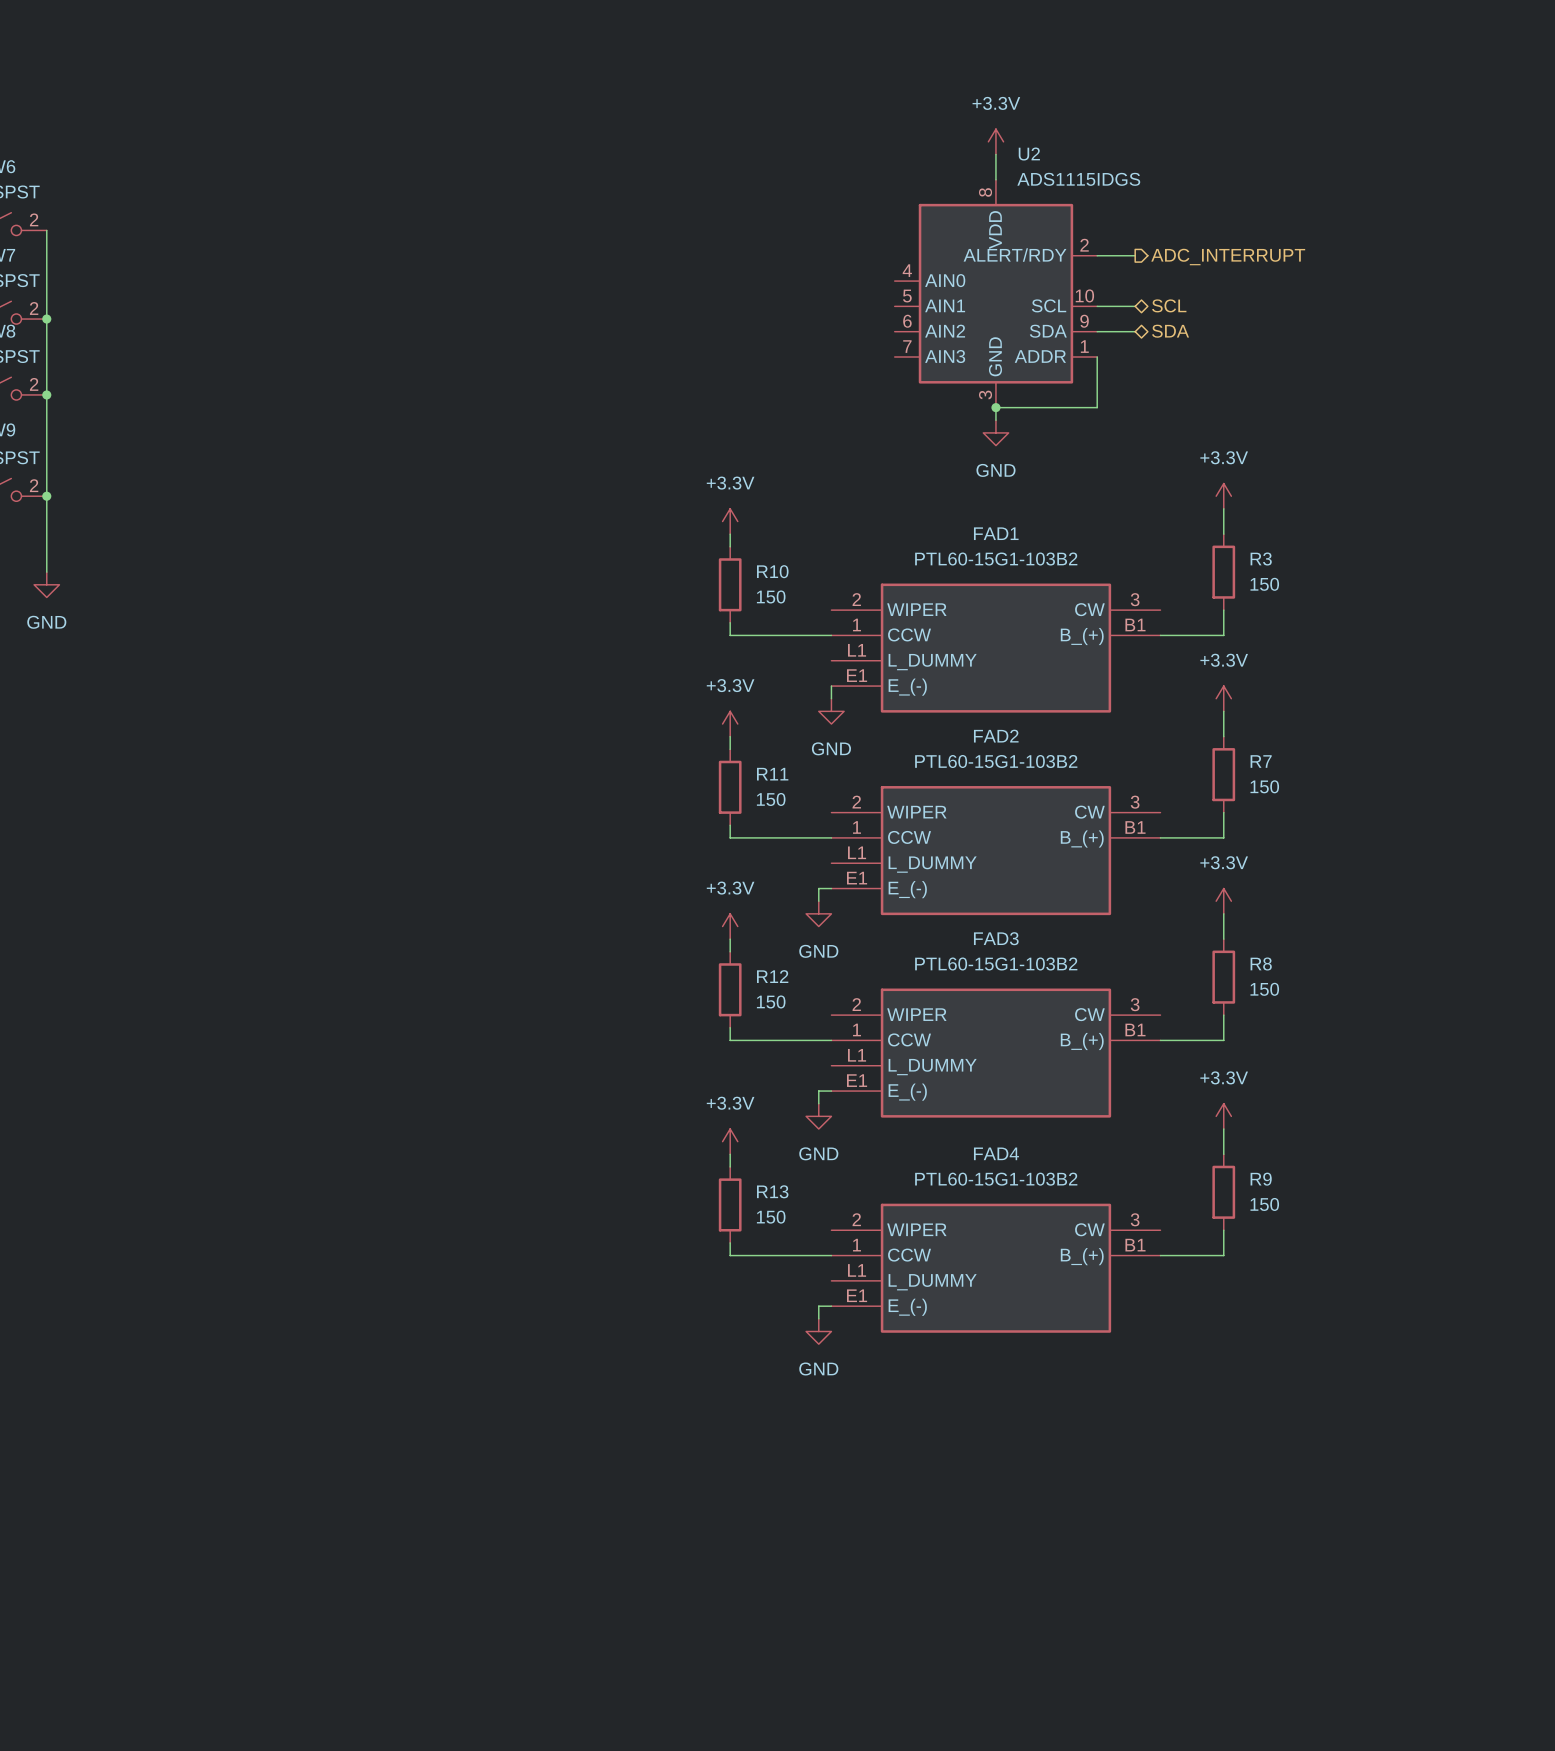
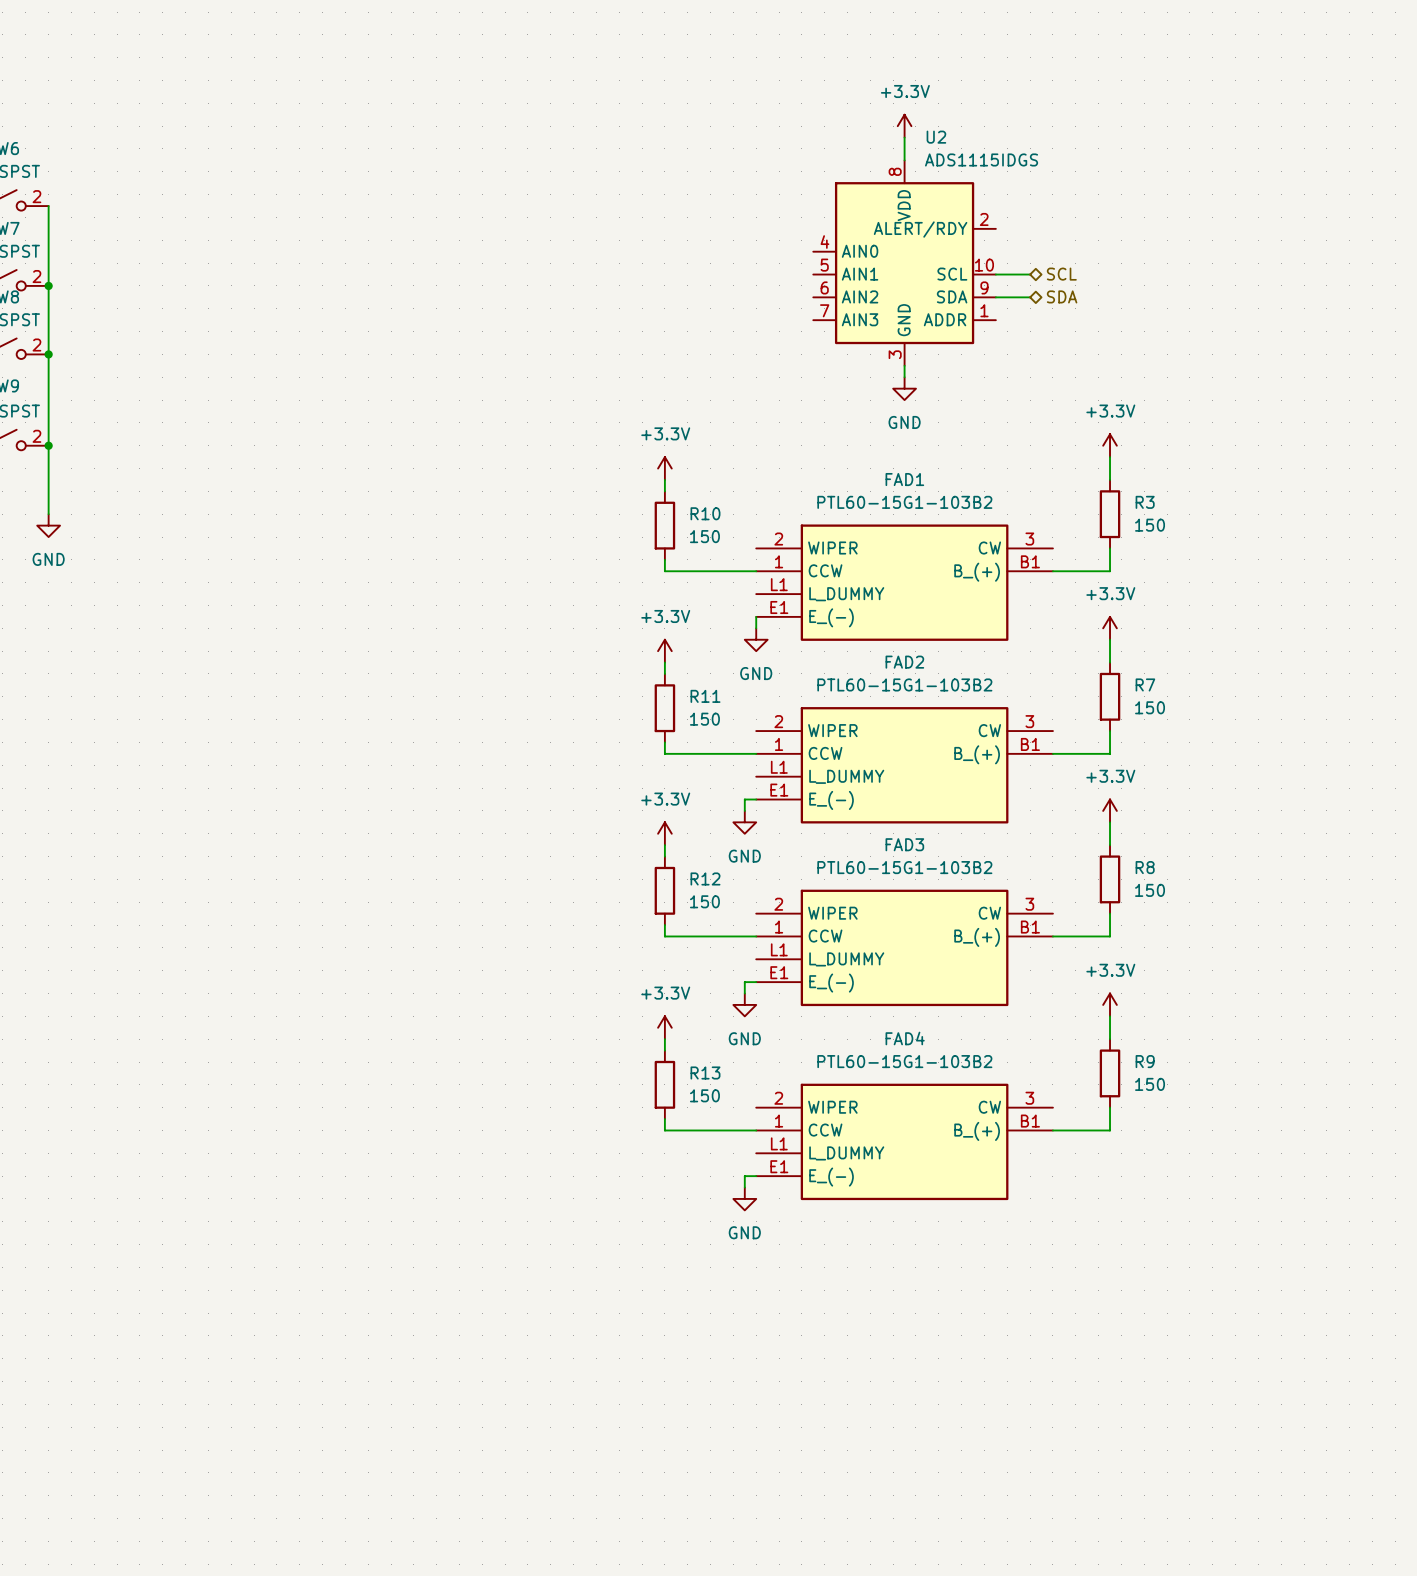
wire: (1097, 255) (1135, 255) -> none
hierarchical label: ADC_INTERRUPT (1228, 257) -> none
wire: (1097, 357) (1097, 407) (995, 407) -> none
junction: (995, 407) -> none

